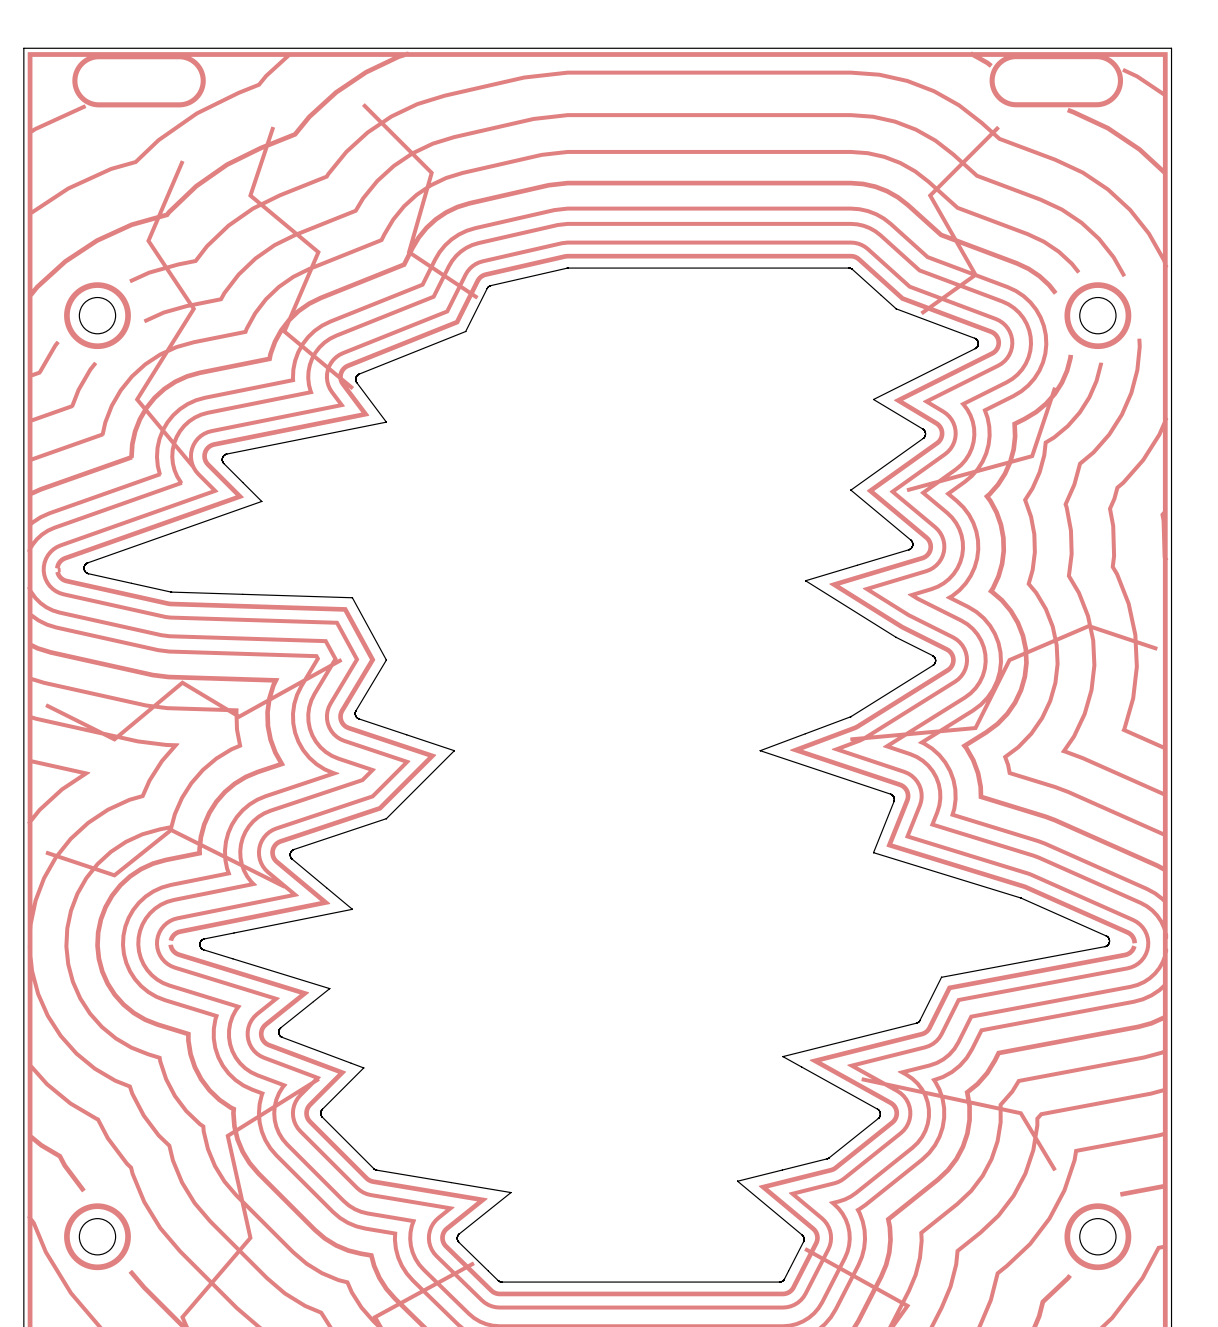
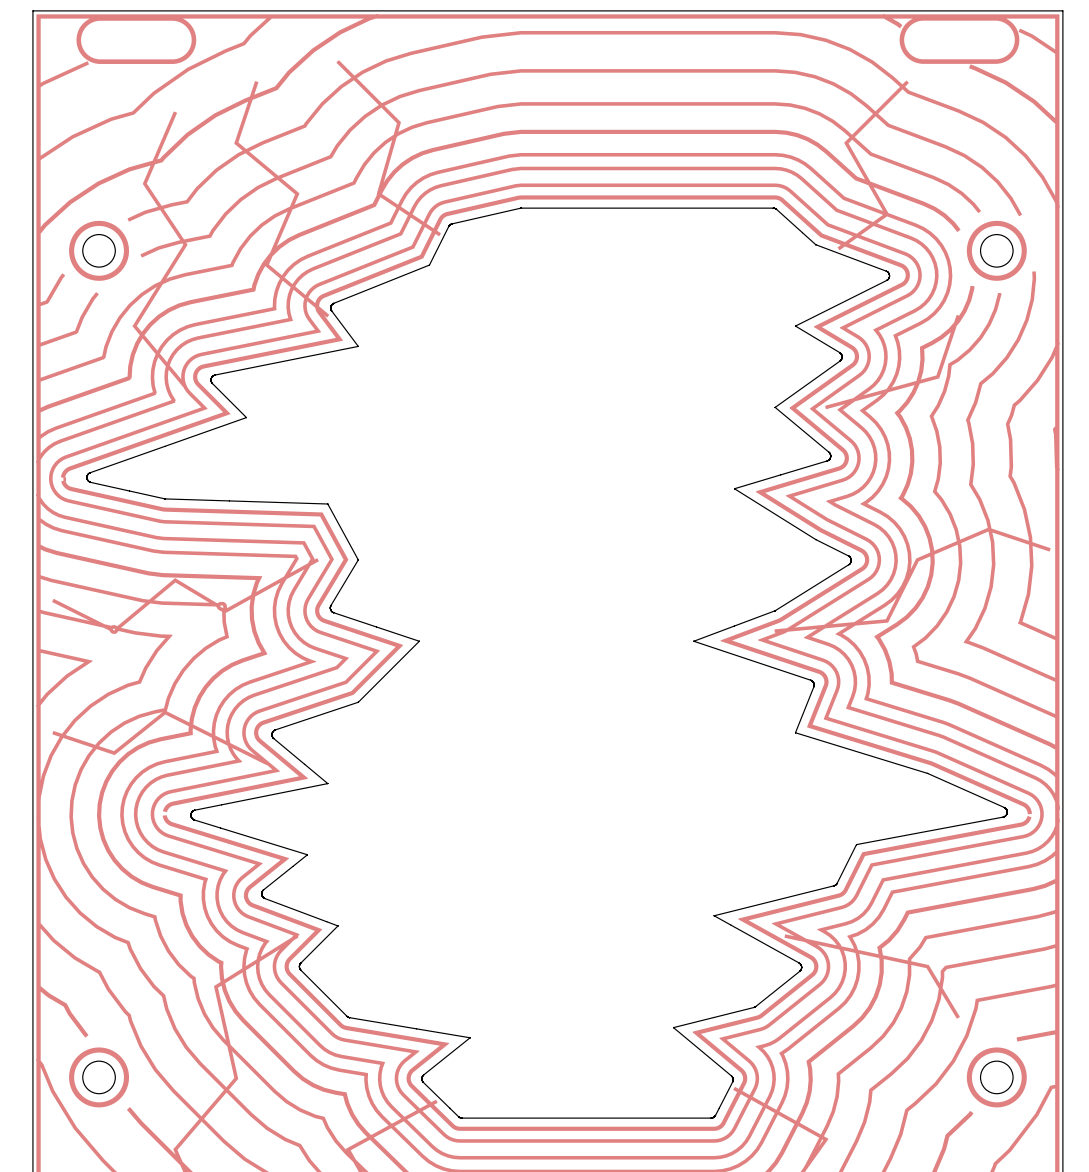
drawing: [184, 675, 277, 797] -> none
drawing: none -> [177, 573, 260, 683]
drawing shape: [103, 680, 185, 816] -> [114, 578, 178, 694]
drawing: none -> [104, 624, 115, 634]

